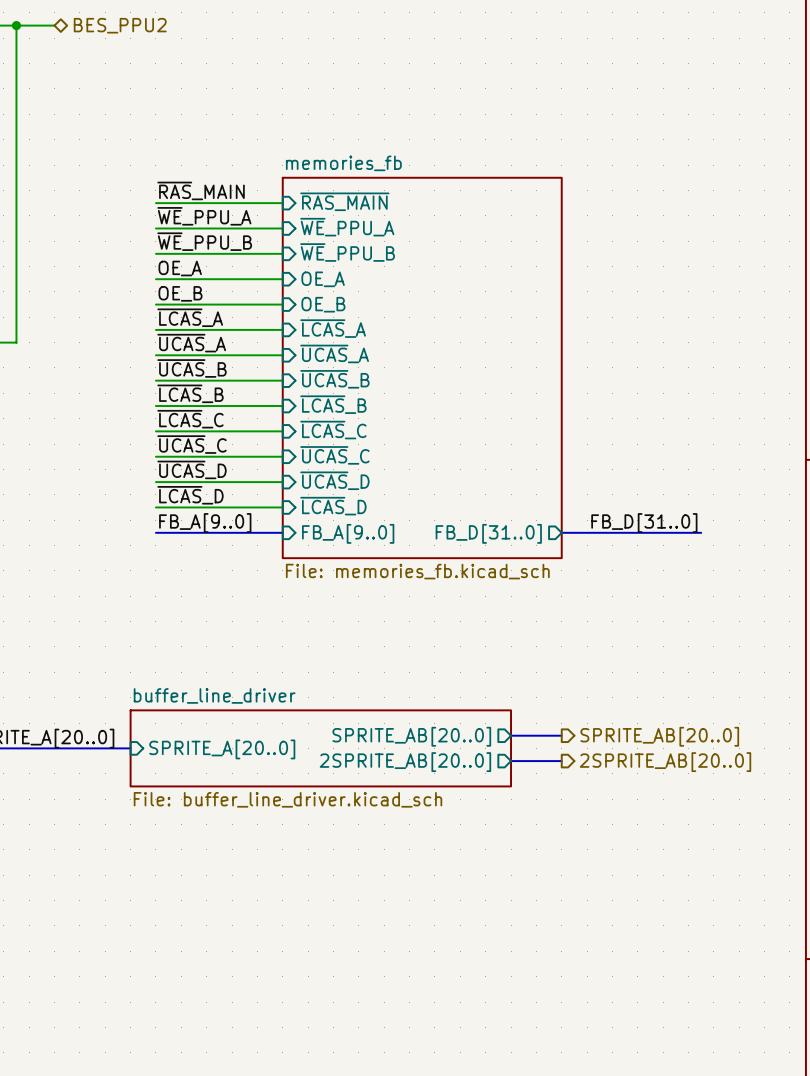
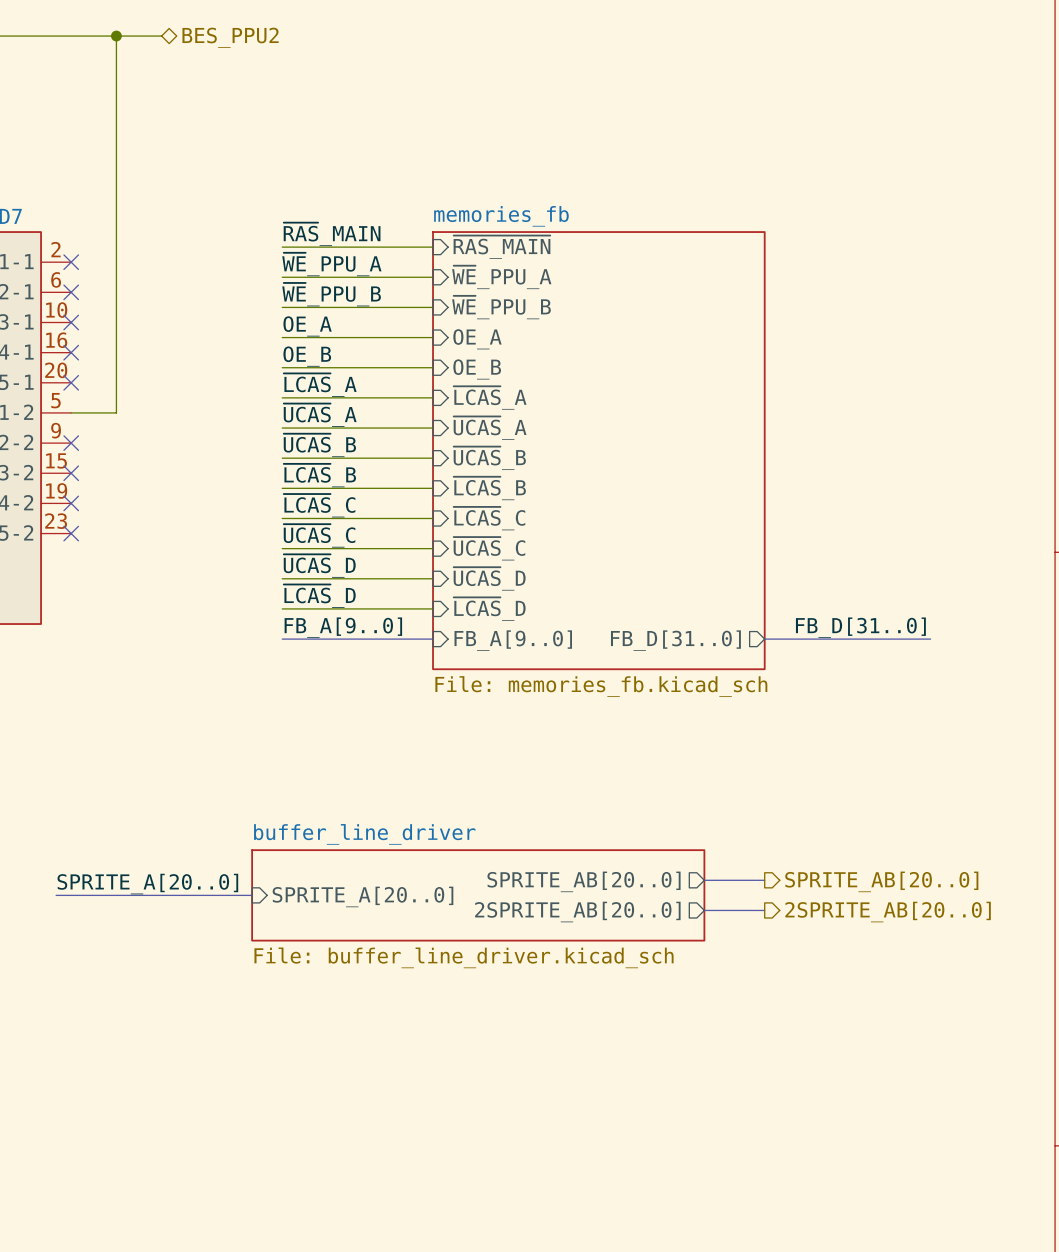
sheet memories_fb shape: [282, 177, 563, 559] -> [432, 231, 766, 671]

